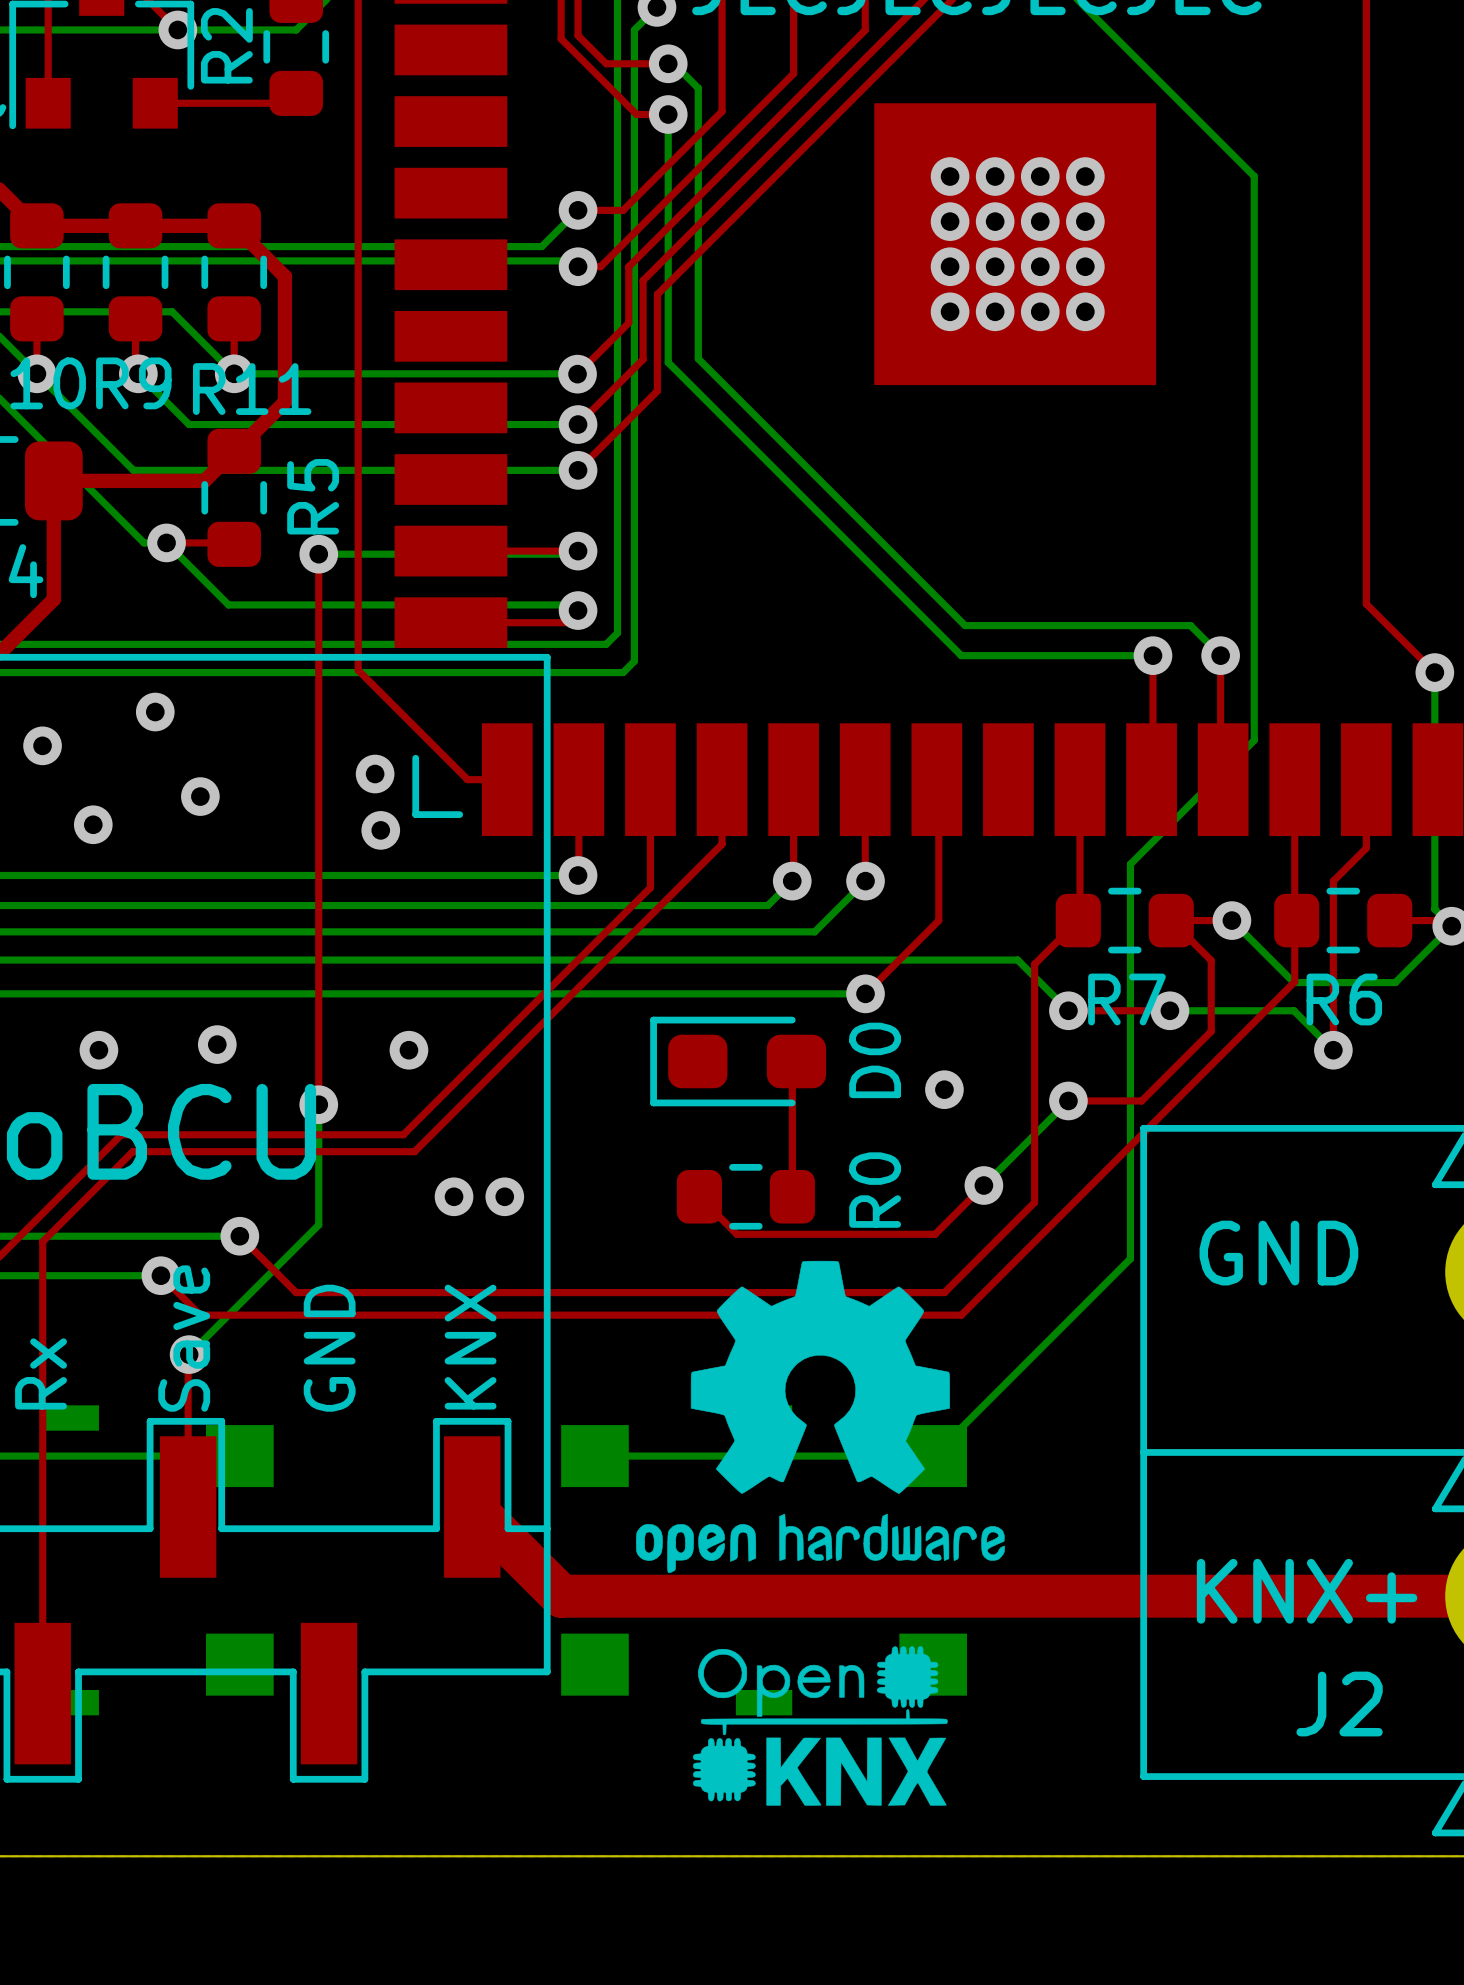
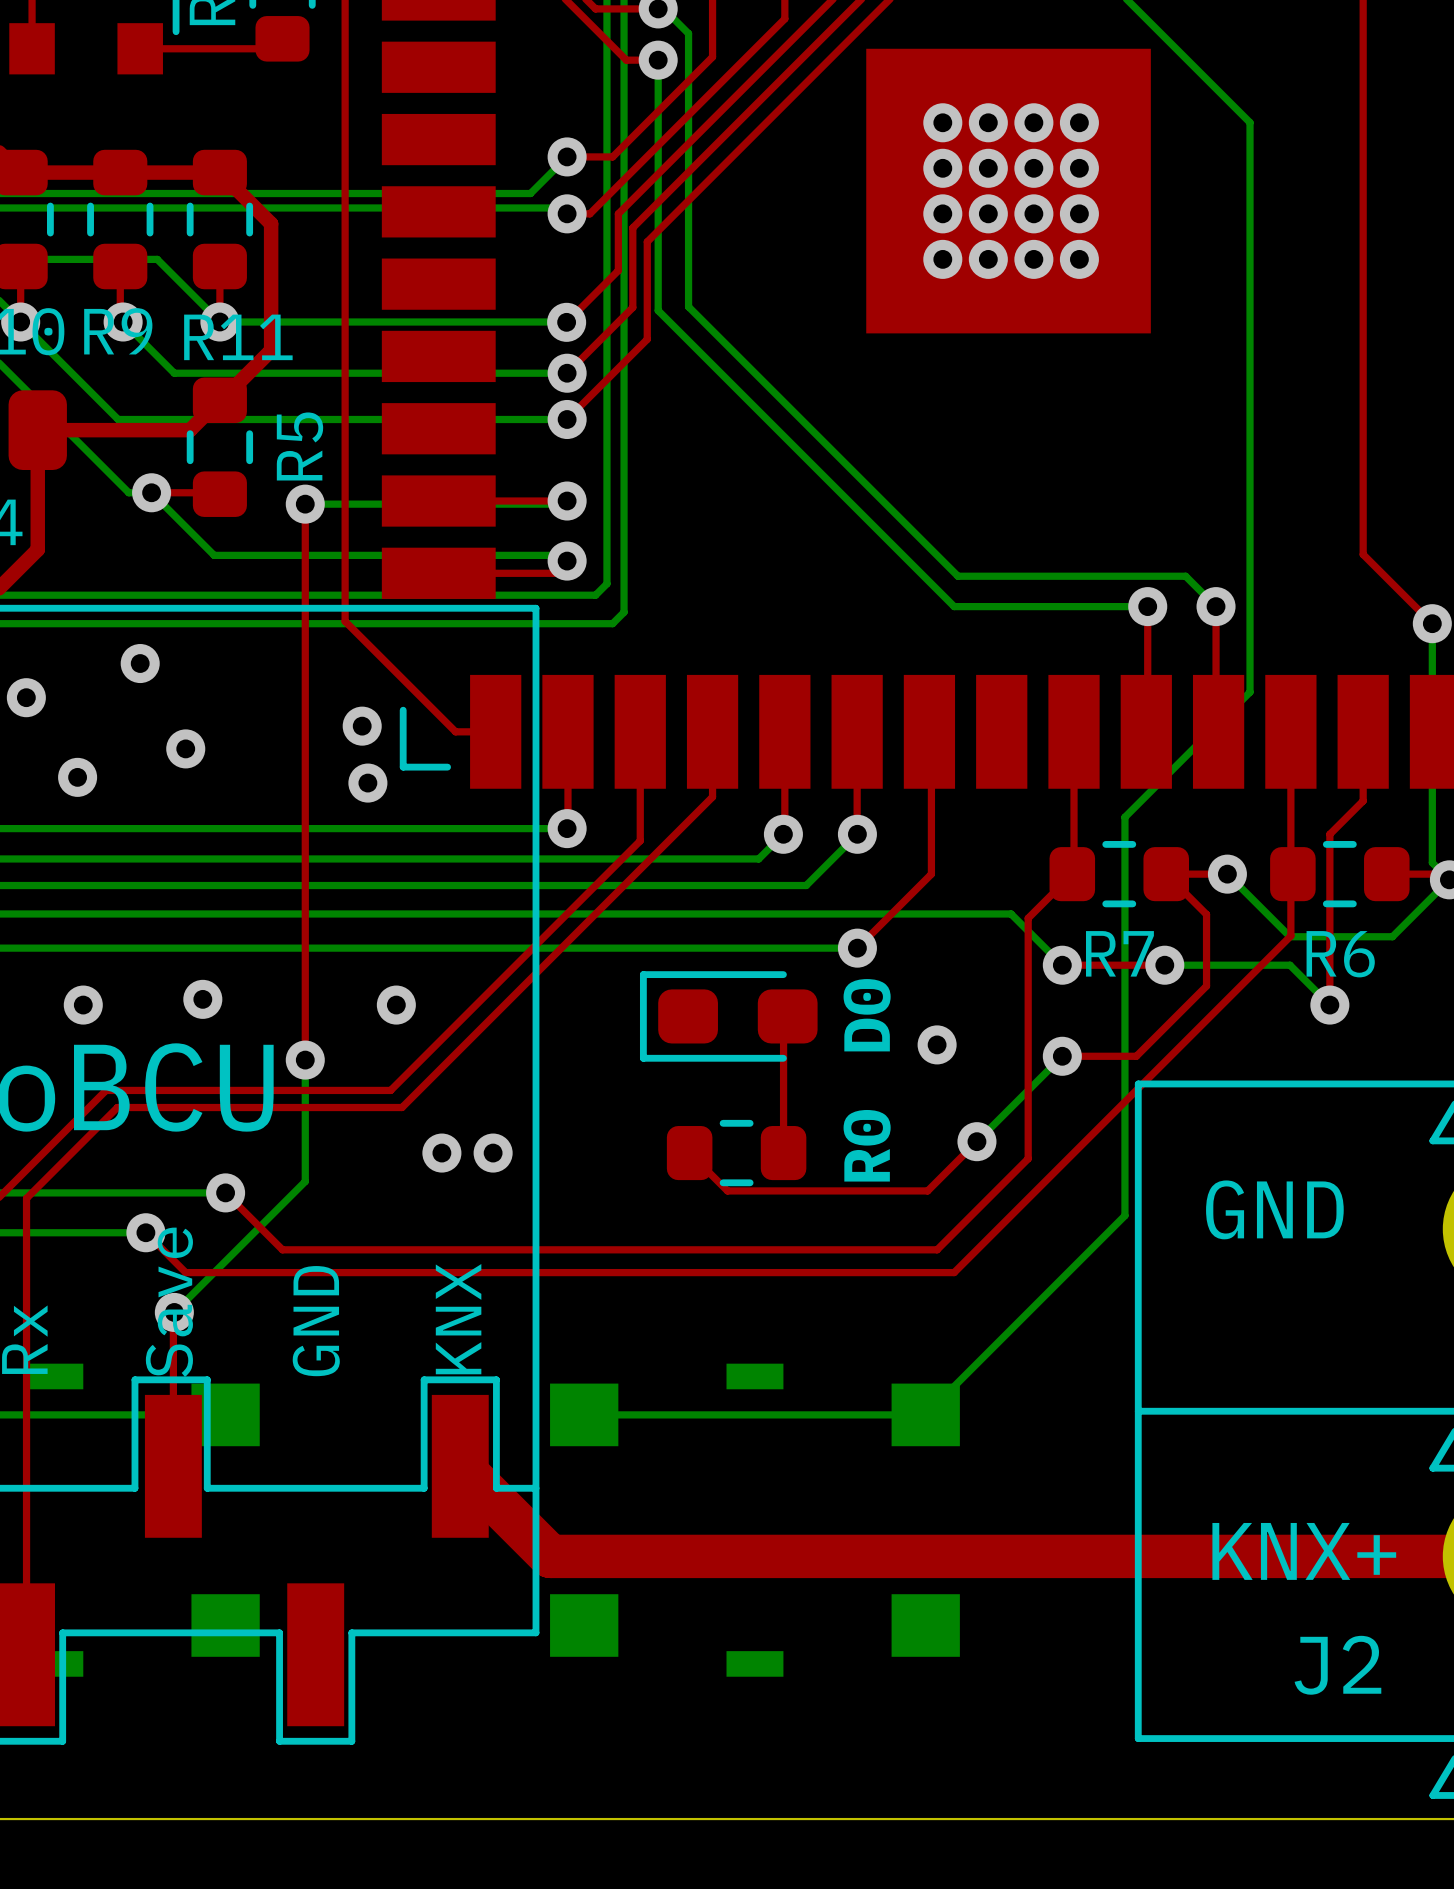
drawing: [636, 1260, 1005, 1574] -> none
drawing: [693, 1646, 948, 1806] -> none

